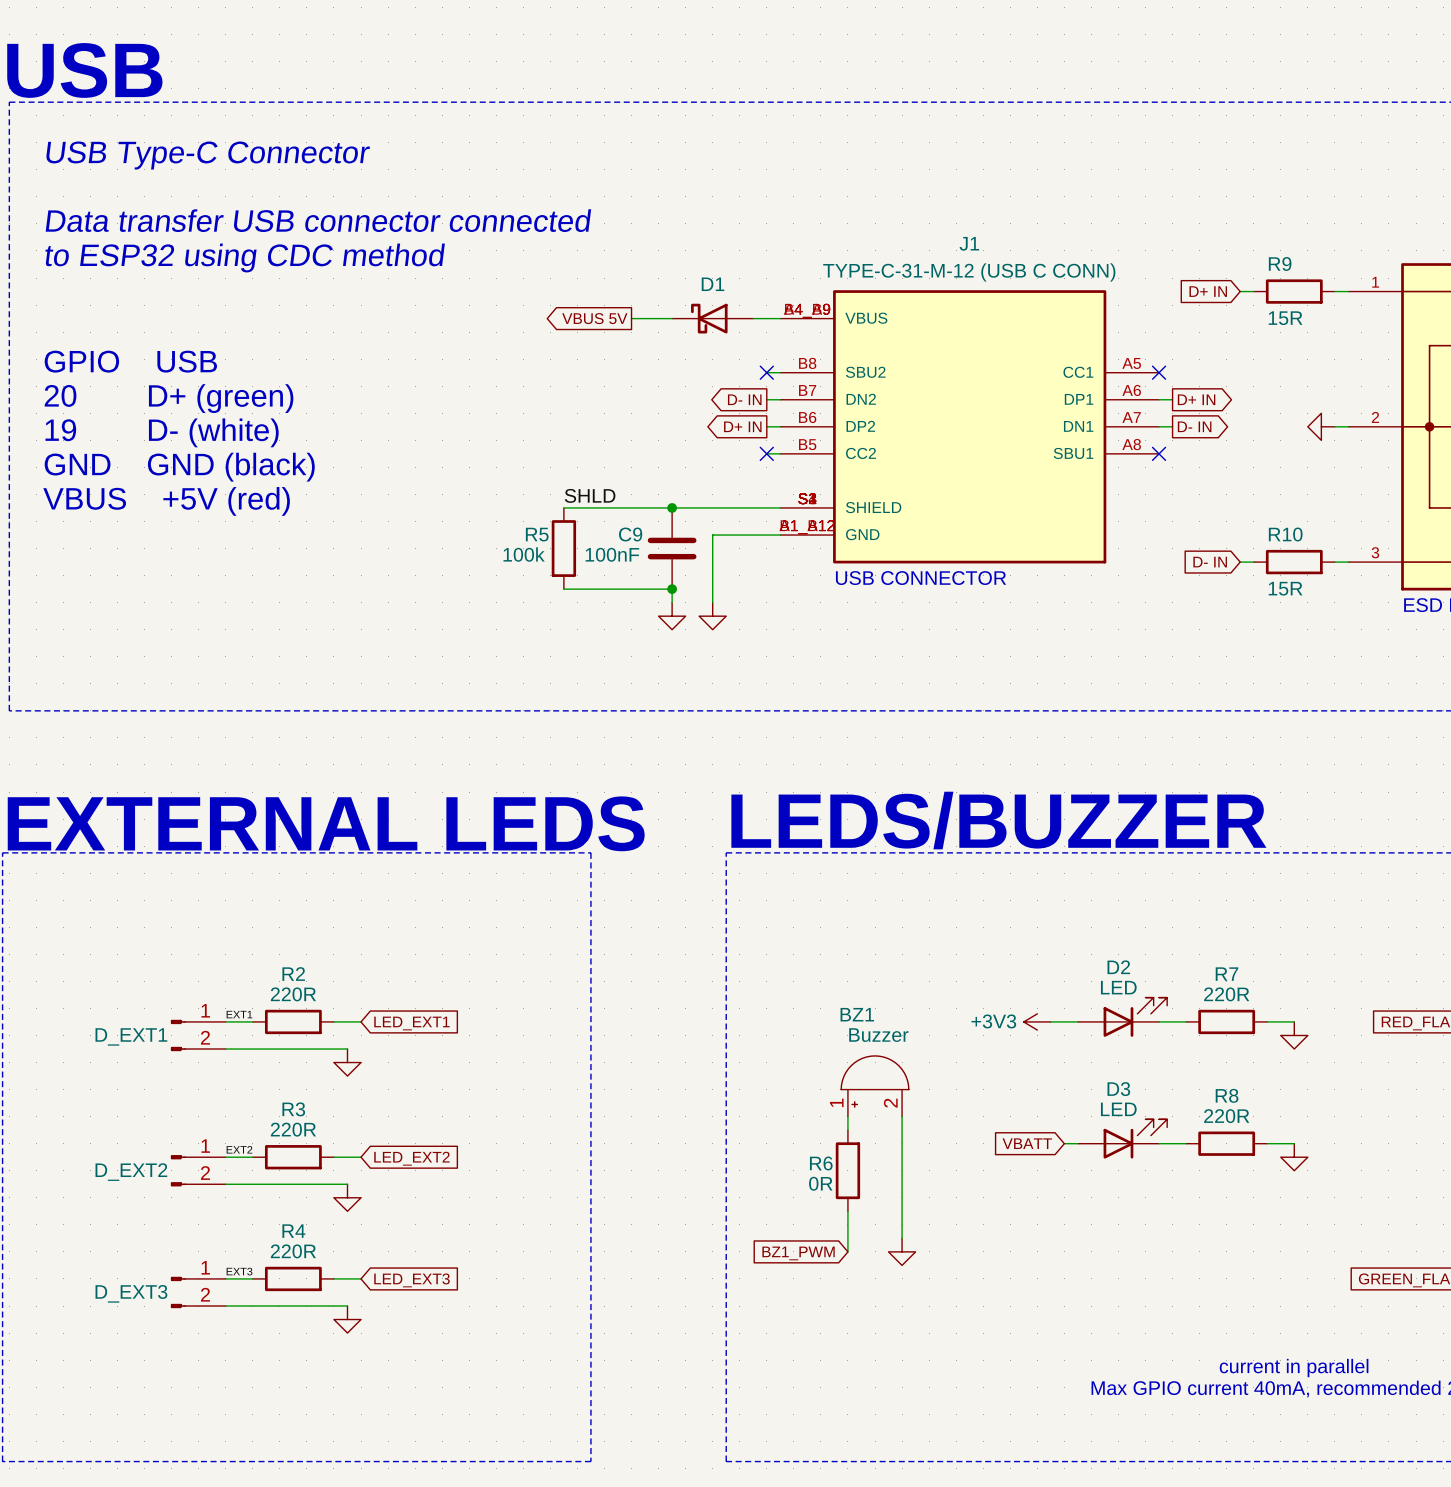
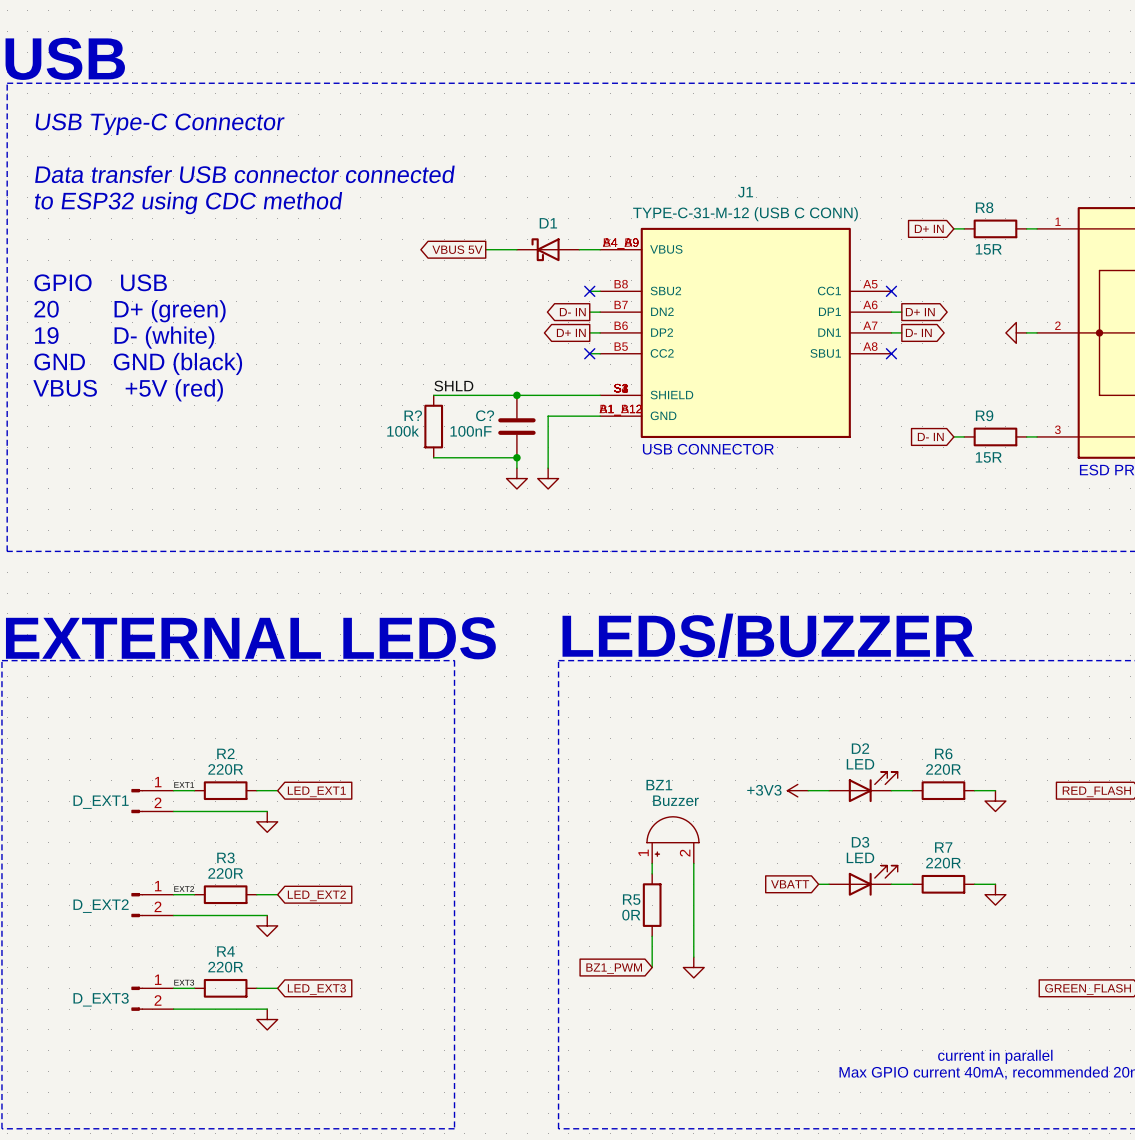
R9 name: R9 (1280, 263) -> R8 (984, 207)
R5 name: R5 (537, 534) -> R? (413, 415)
C9 name: C9 (630, 534) -> C? (485, 415)
R10 name: R10 (1285, 534) -> R9 (984, 415)
R7 name: R7 (1226, 974) -> R6 (943, 753)
R8 name: R8 (1227, 1095) -> R7 (943, 847)
R6 name: R6 (821, 1163) -> R5 (631, 899)

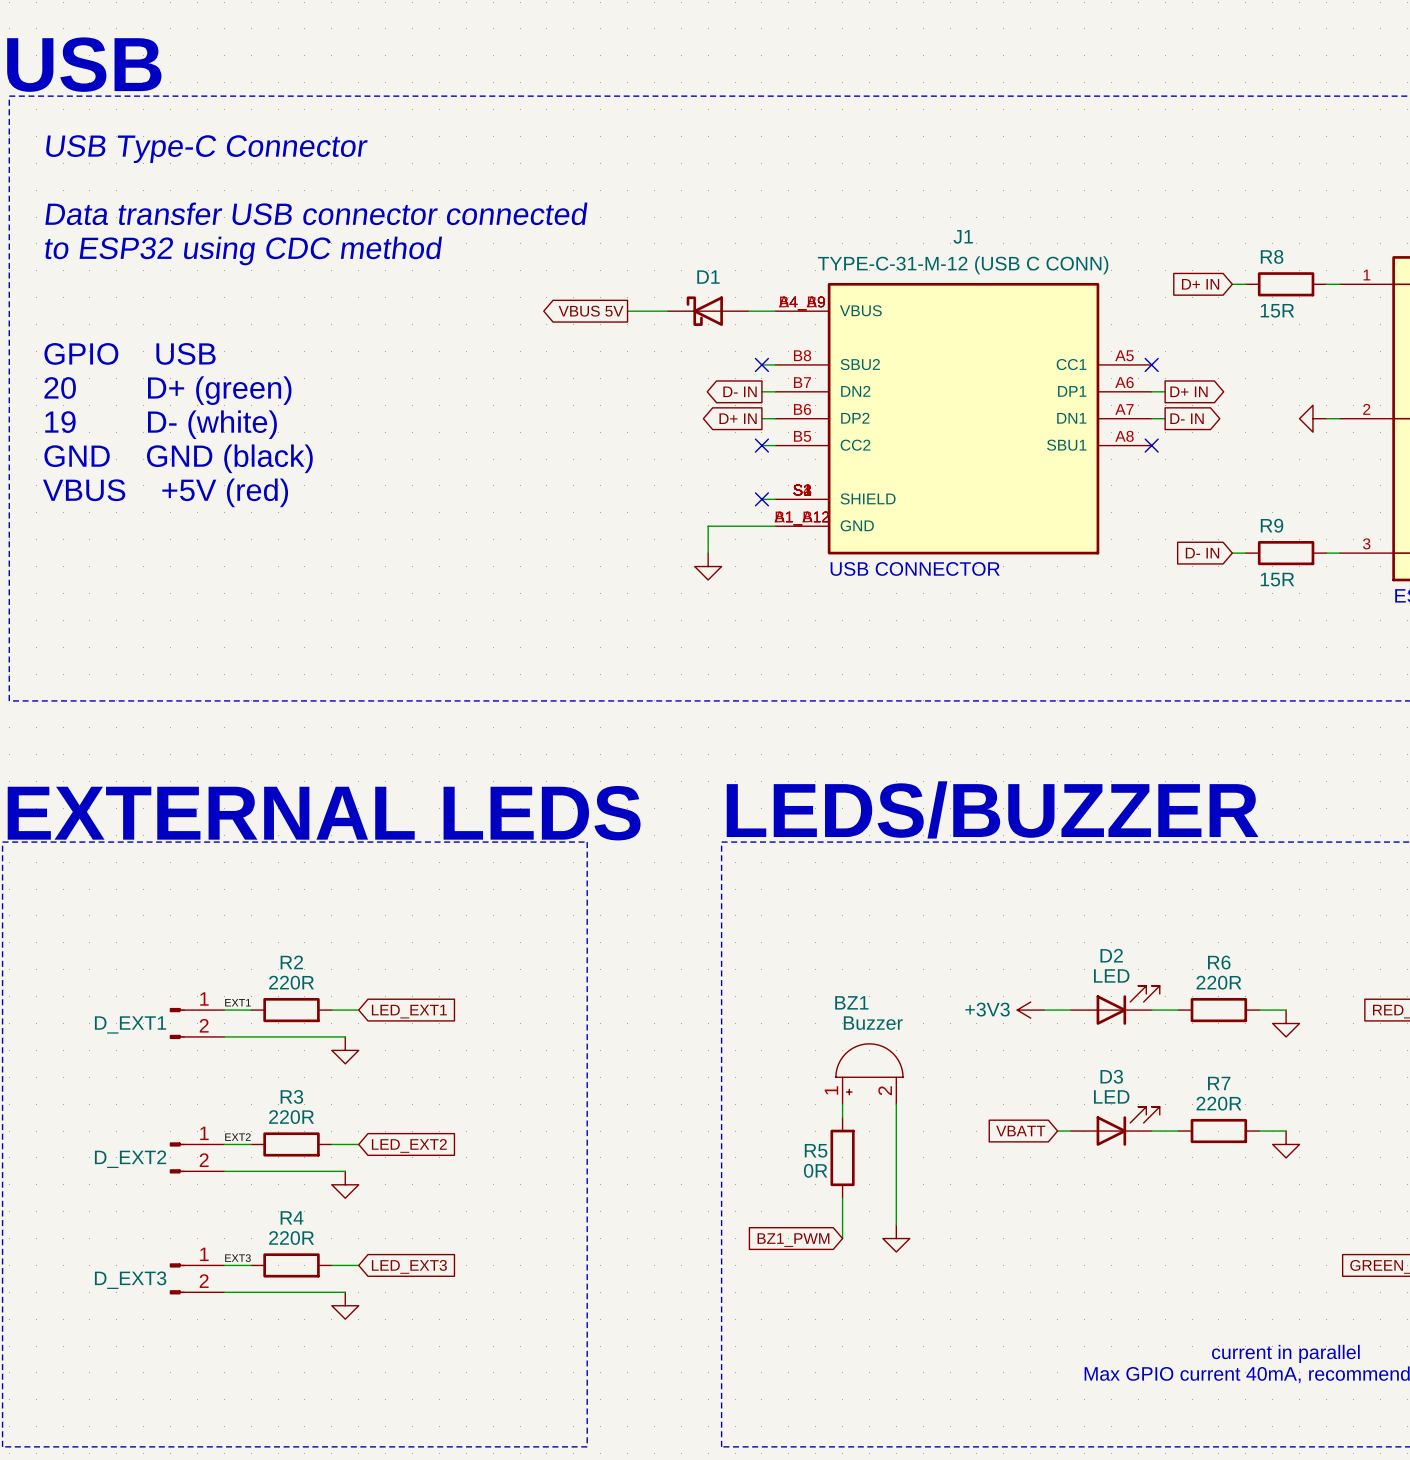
label: SHLD (453, 386) -> none
wire: (433, 395) (589, 395) -> none
junction: (516, 395) -> none
no-connect mark: none -> (761, 499)
R?: 100k (433, 426) -> none
C?: 100nF (516, 426) -> none
wire: (548, 436) (548, 468) -> none
power symbol: none -> (708, 566)
wire: (433, 457) (516, 457) (516, 468) -> none
junction: (516, 457) -> none
power symbol: (516, 478) -> none
power symbol: (548, 478) -> none

